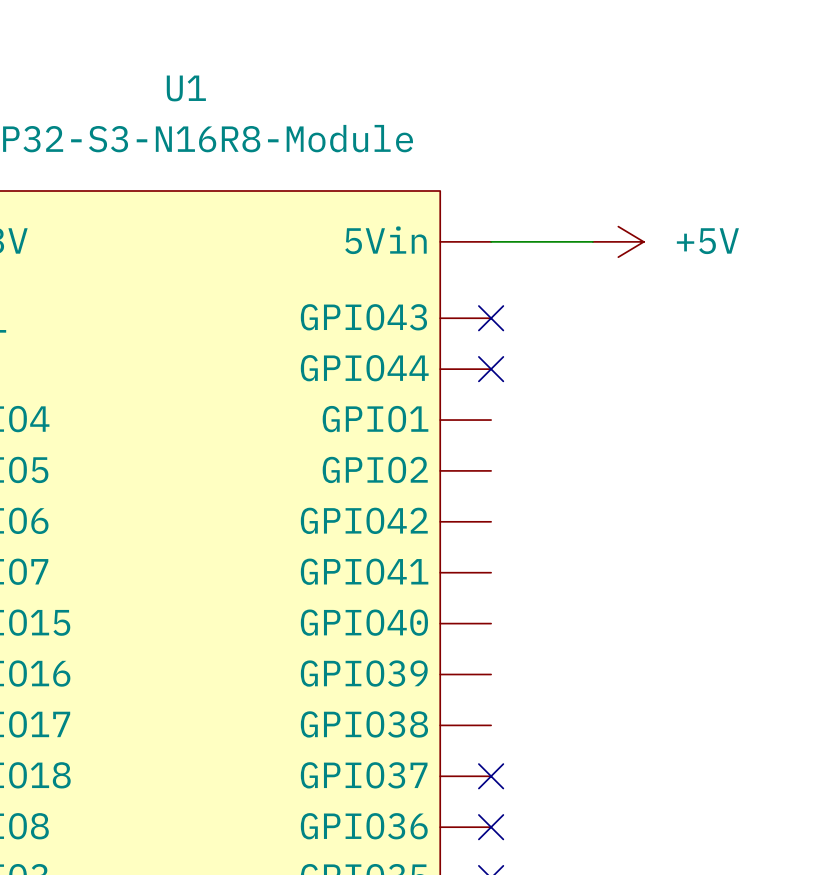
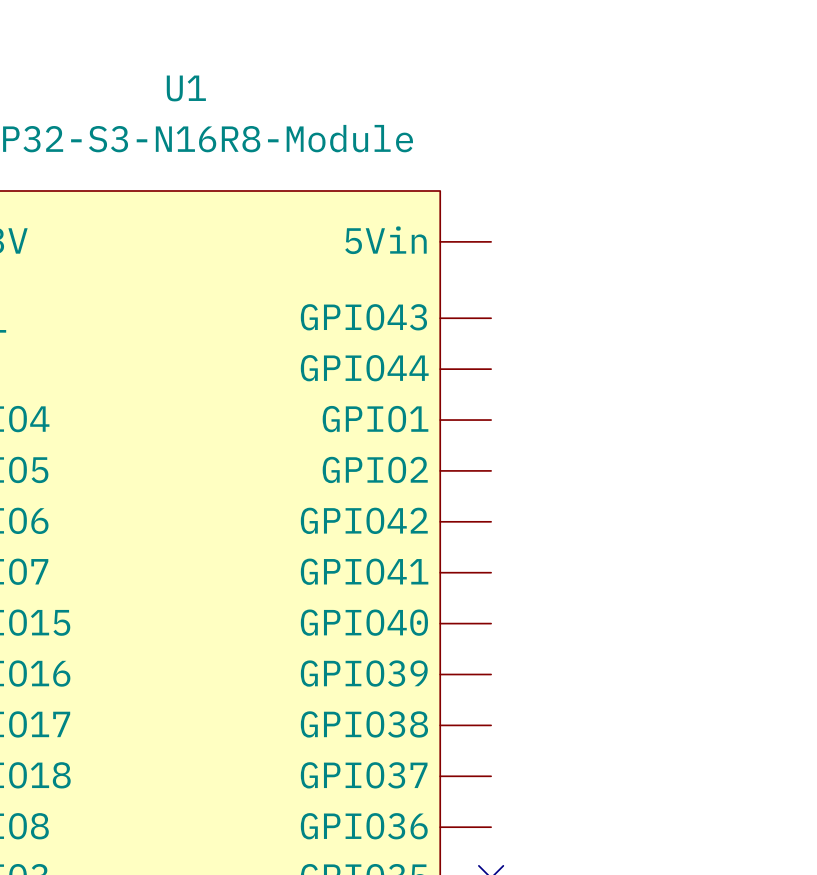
wire: (491, 241) (592, 241) -> none
power symbol: +5V (618, 241) -> none
no-connect mark: (491, 318) -> none
no-connect mark: (491, 369) -> none
no-connect mark: (491, 776) -> none
no-connect mark: (491, 827) -> none

